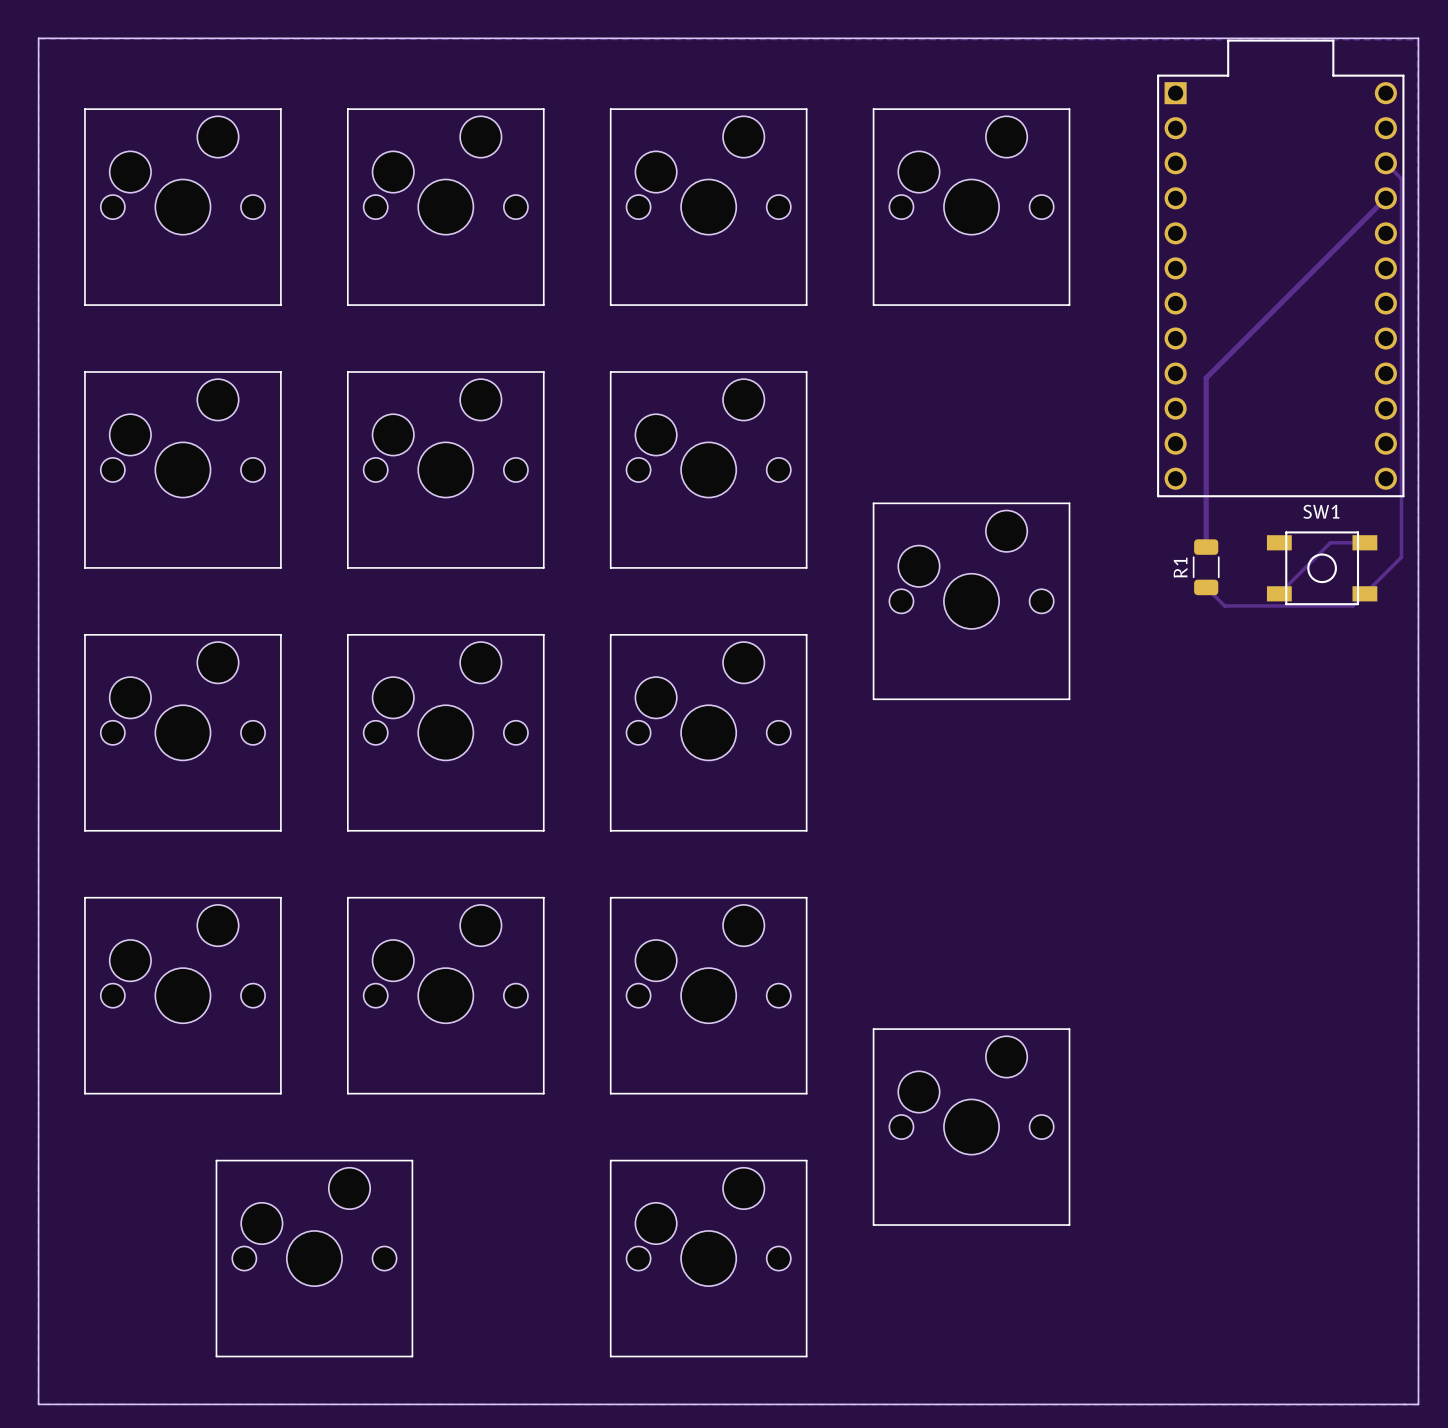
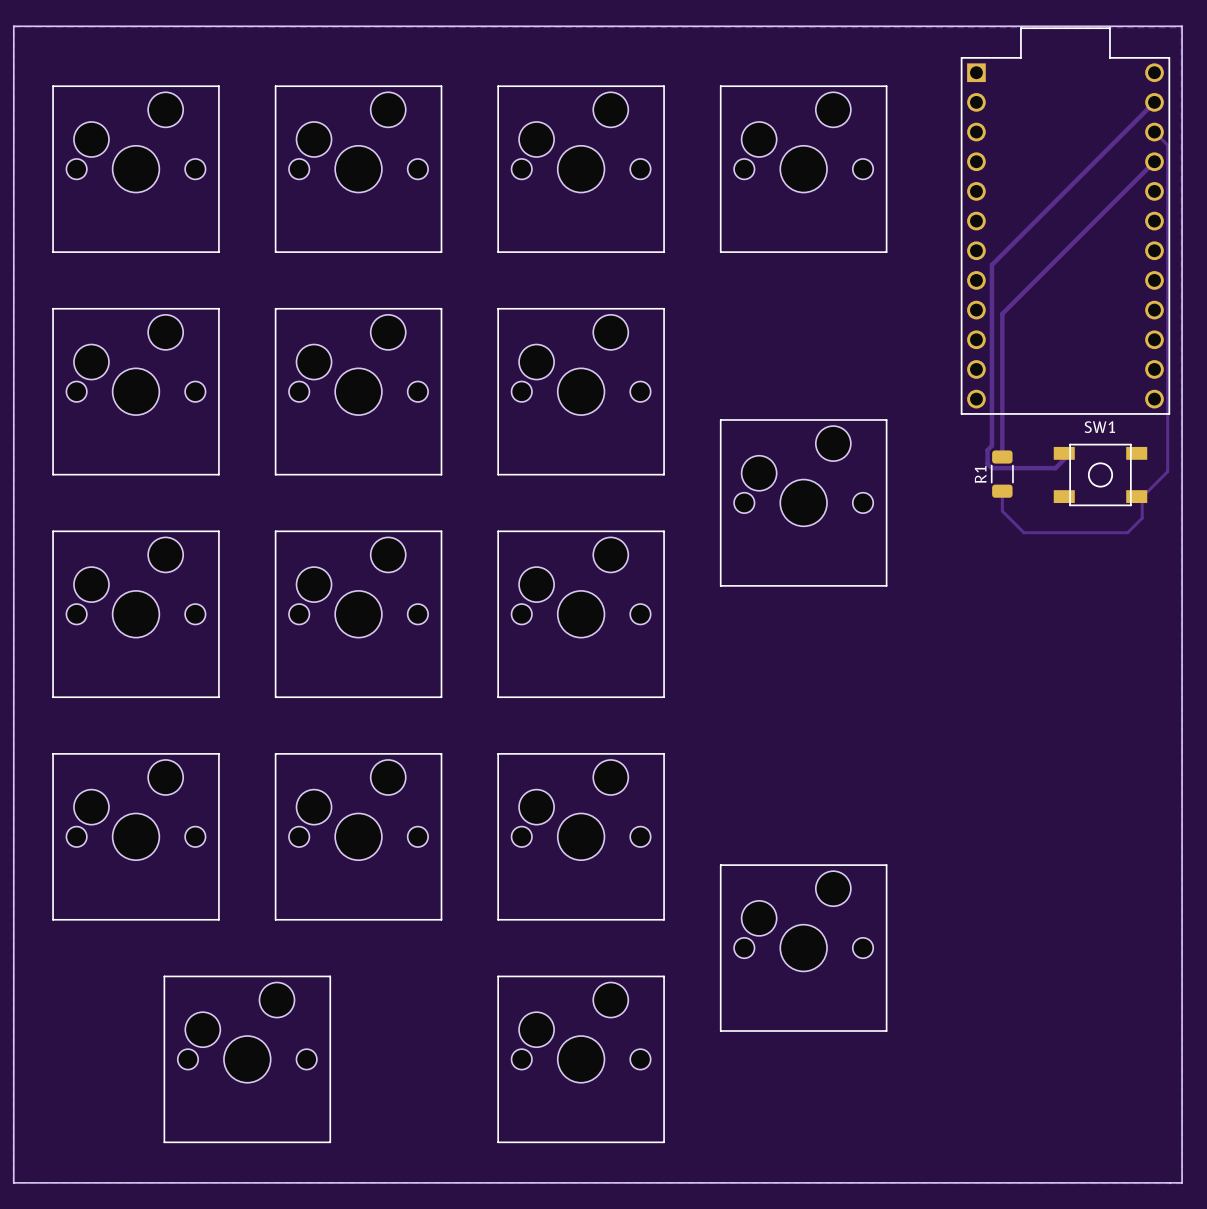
track: none -> (1154, 102) (991, 264) (991, 445) (987, 450) (987, 463) (991, 468) (1055, 468) (1069, 453)
track: (1364, 542) (1330, 542) (1279, 593) -> none
track: (1401, 557) (1352, 605) (1224, 605) (1206, 587) -> (1167, 465) (1167, 471) (1142, 497) (1142, 518) (1127, 532) (1023, 532) (1002, 511) (1002, 491)

